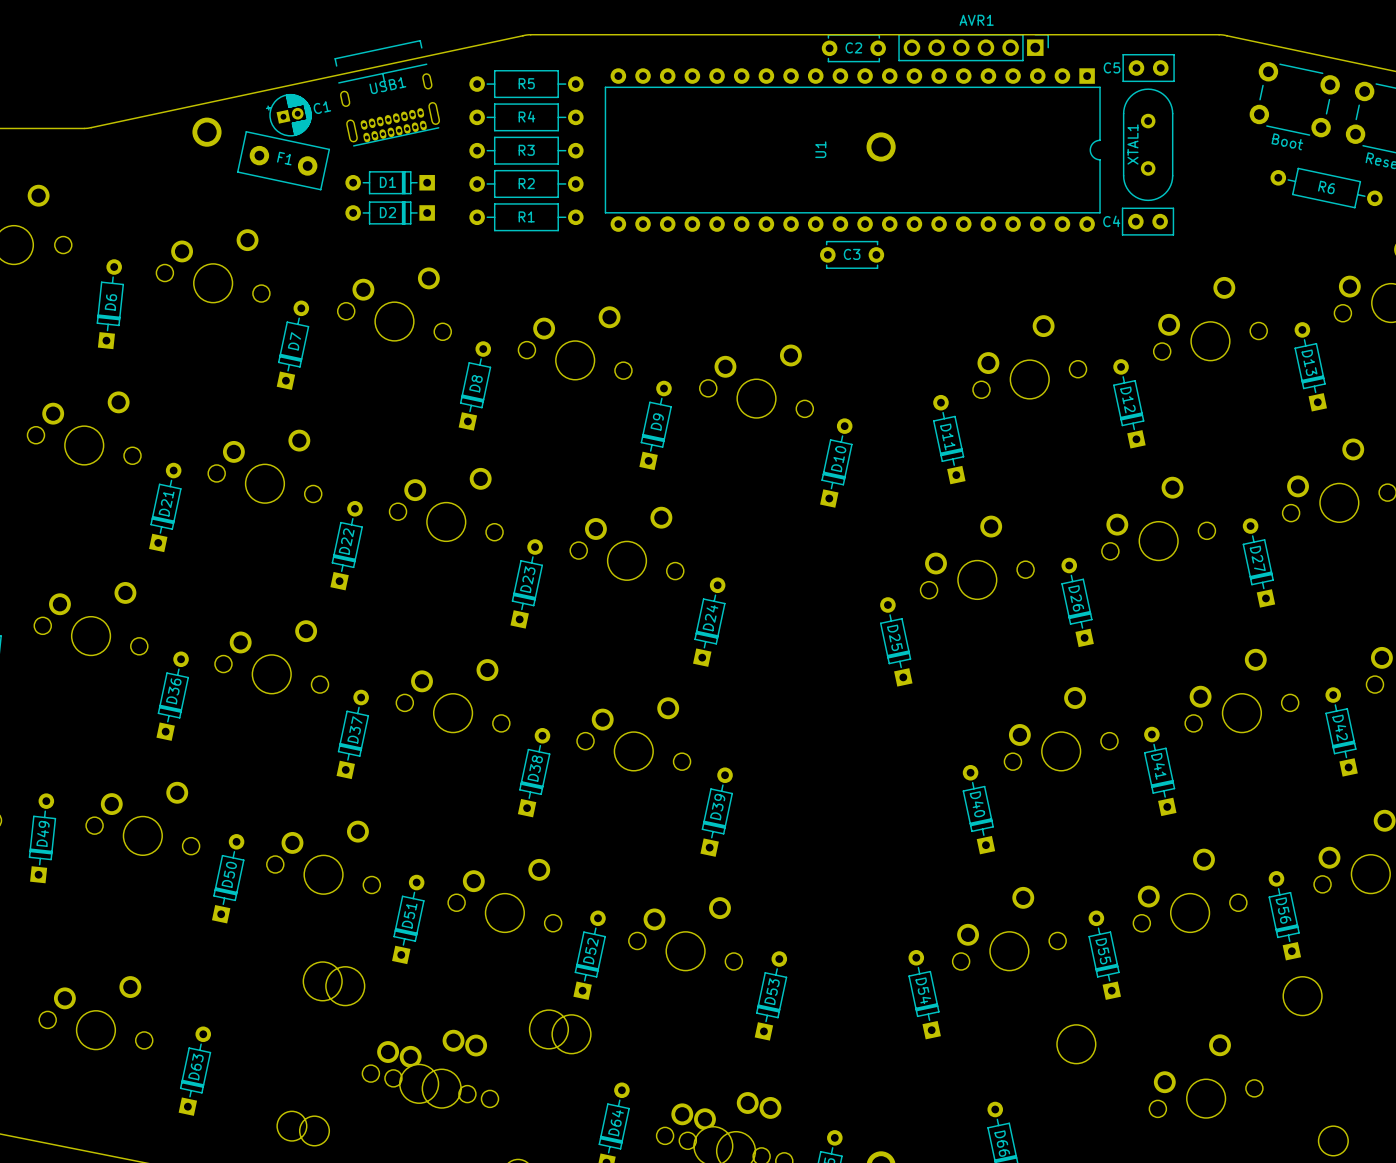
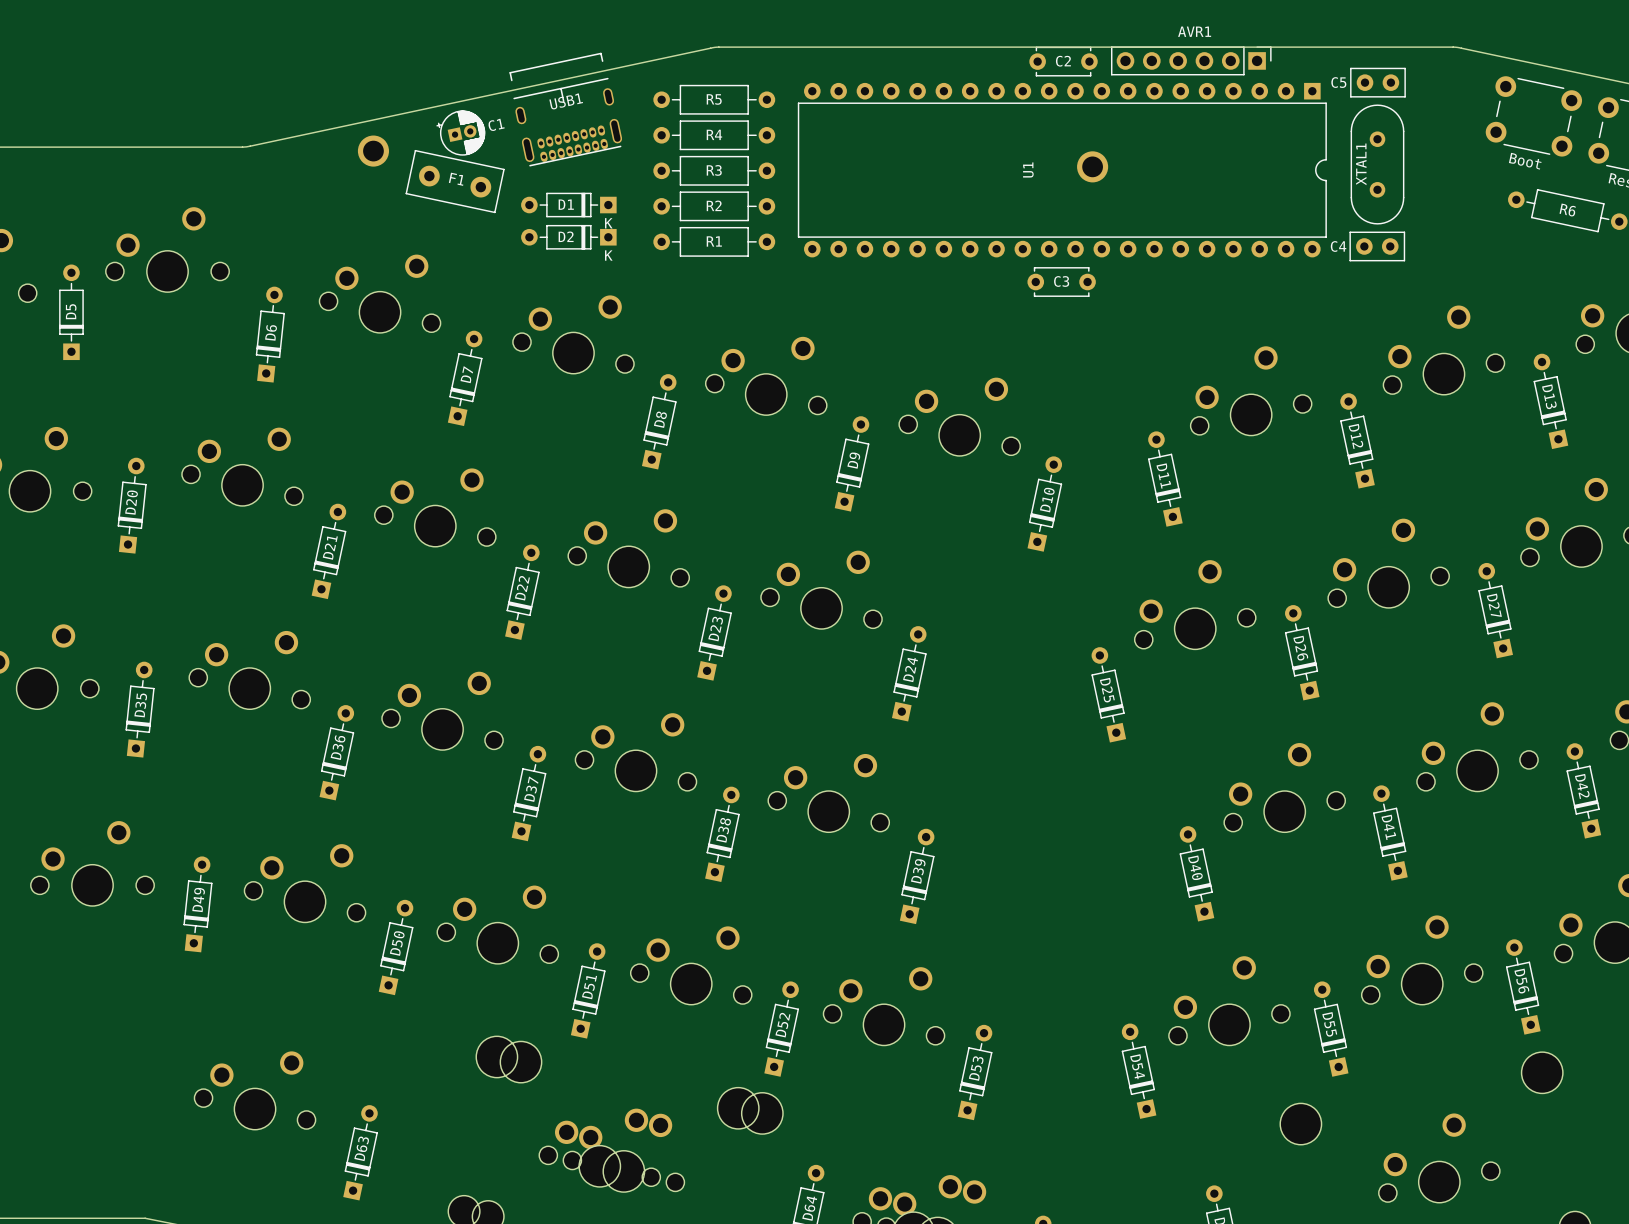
D1 text: none -> K (608, 223)
D2 text: none -> K (608, 255)

